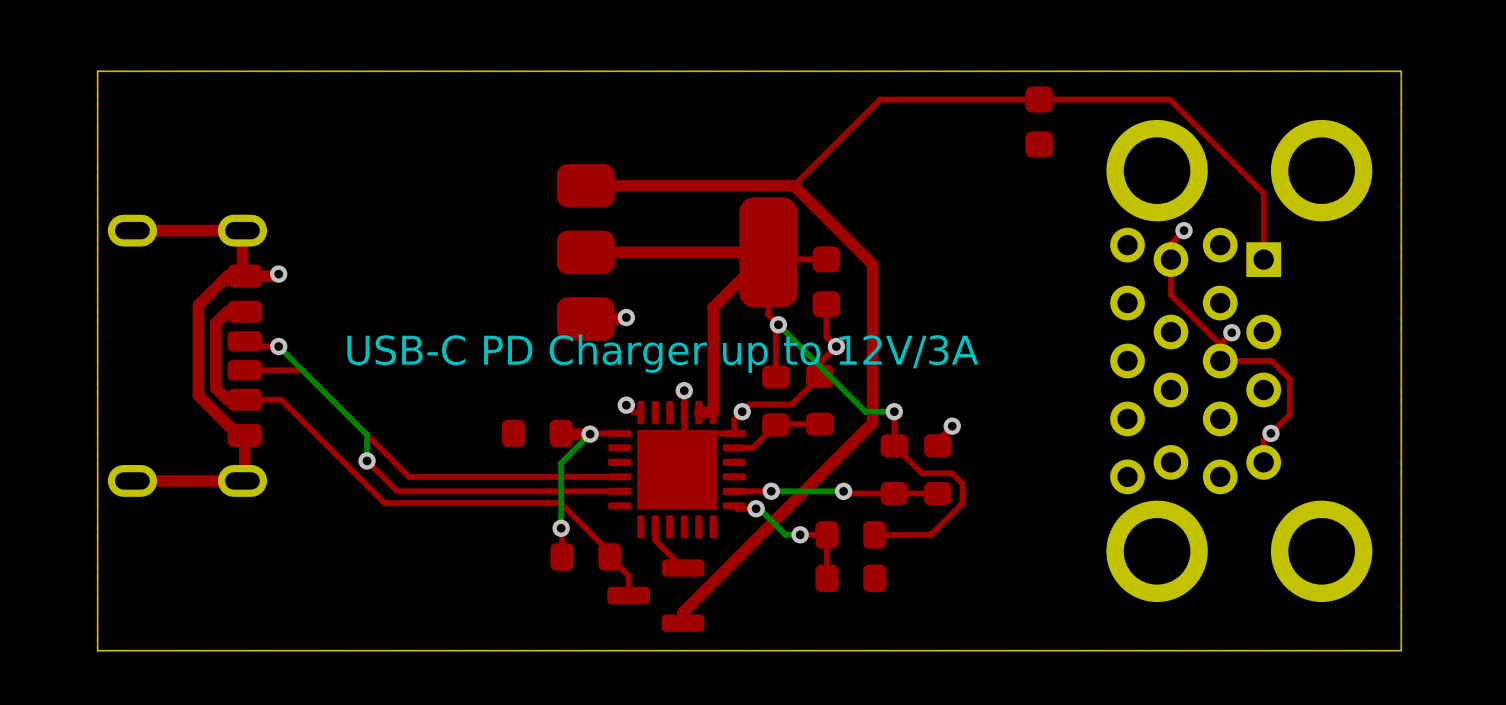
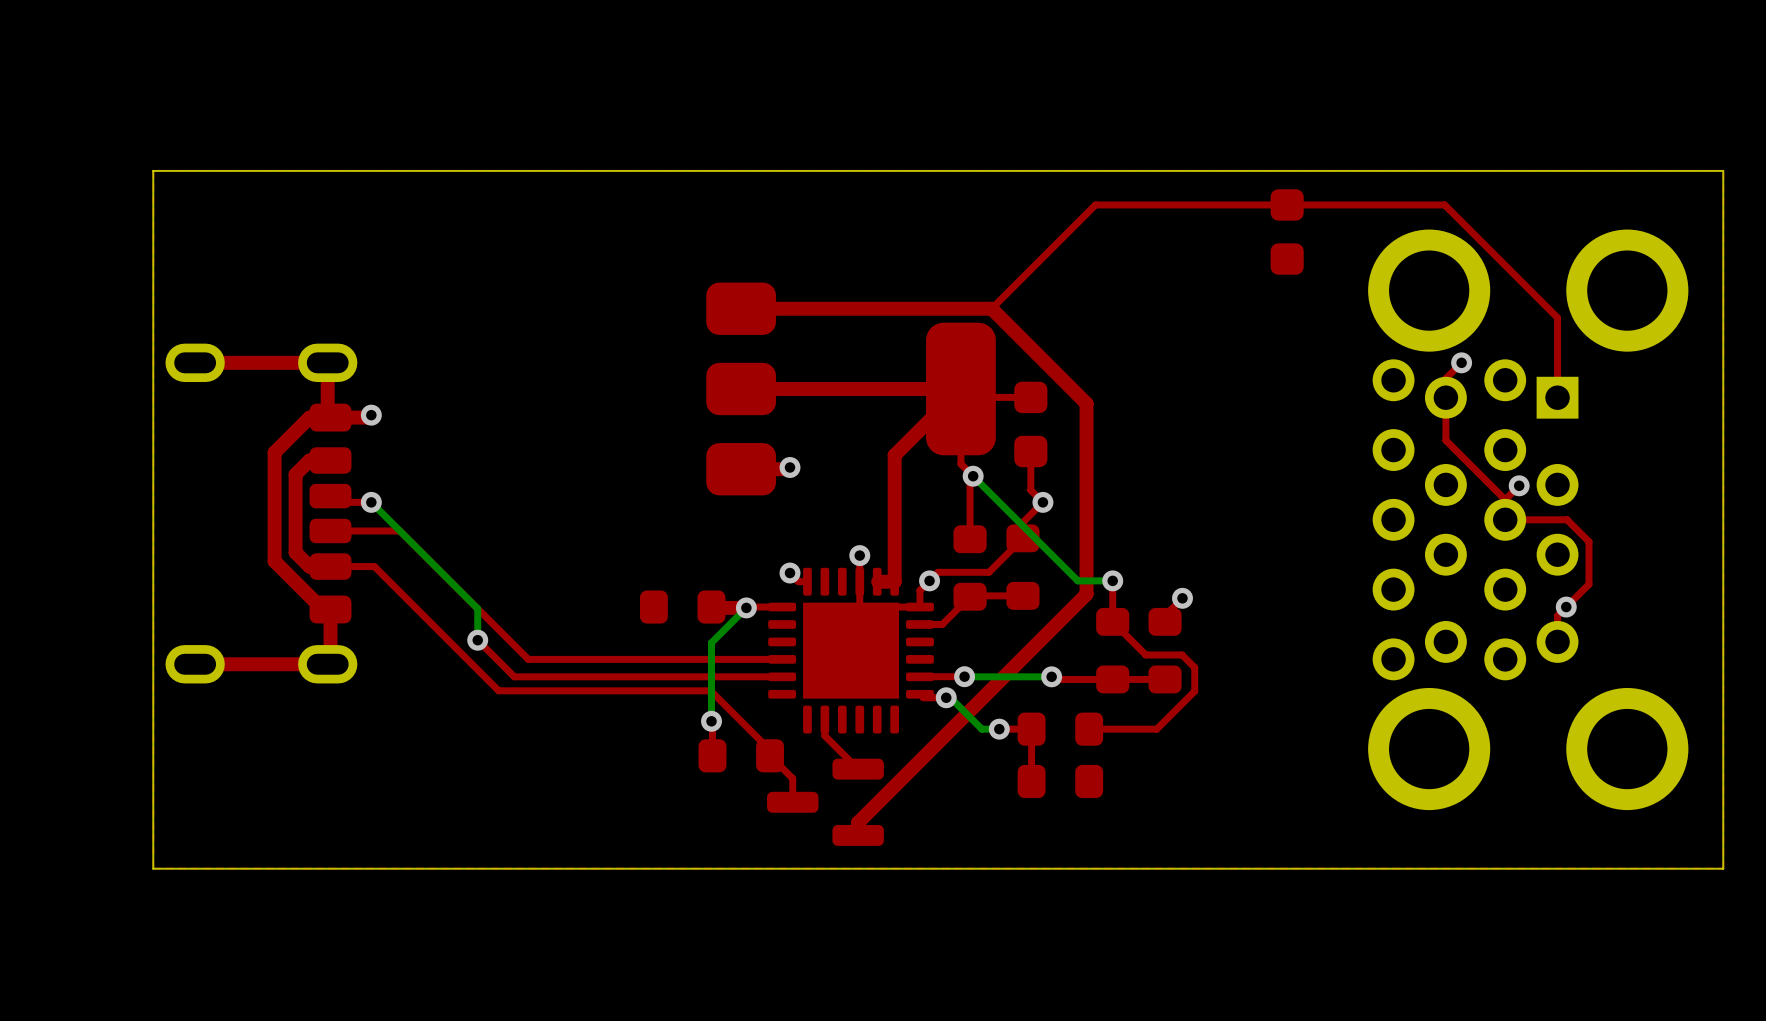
text: USB-C PD Charger up to 12V/3A (662, 353) -> none

